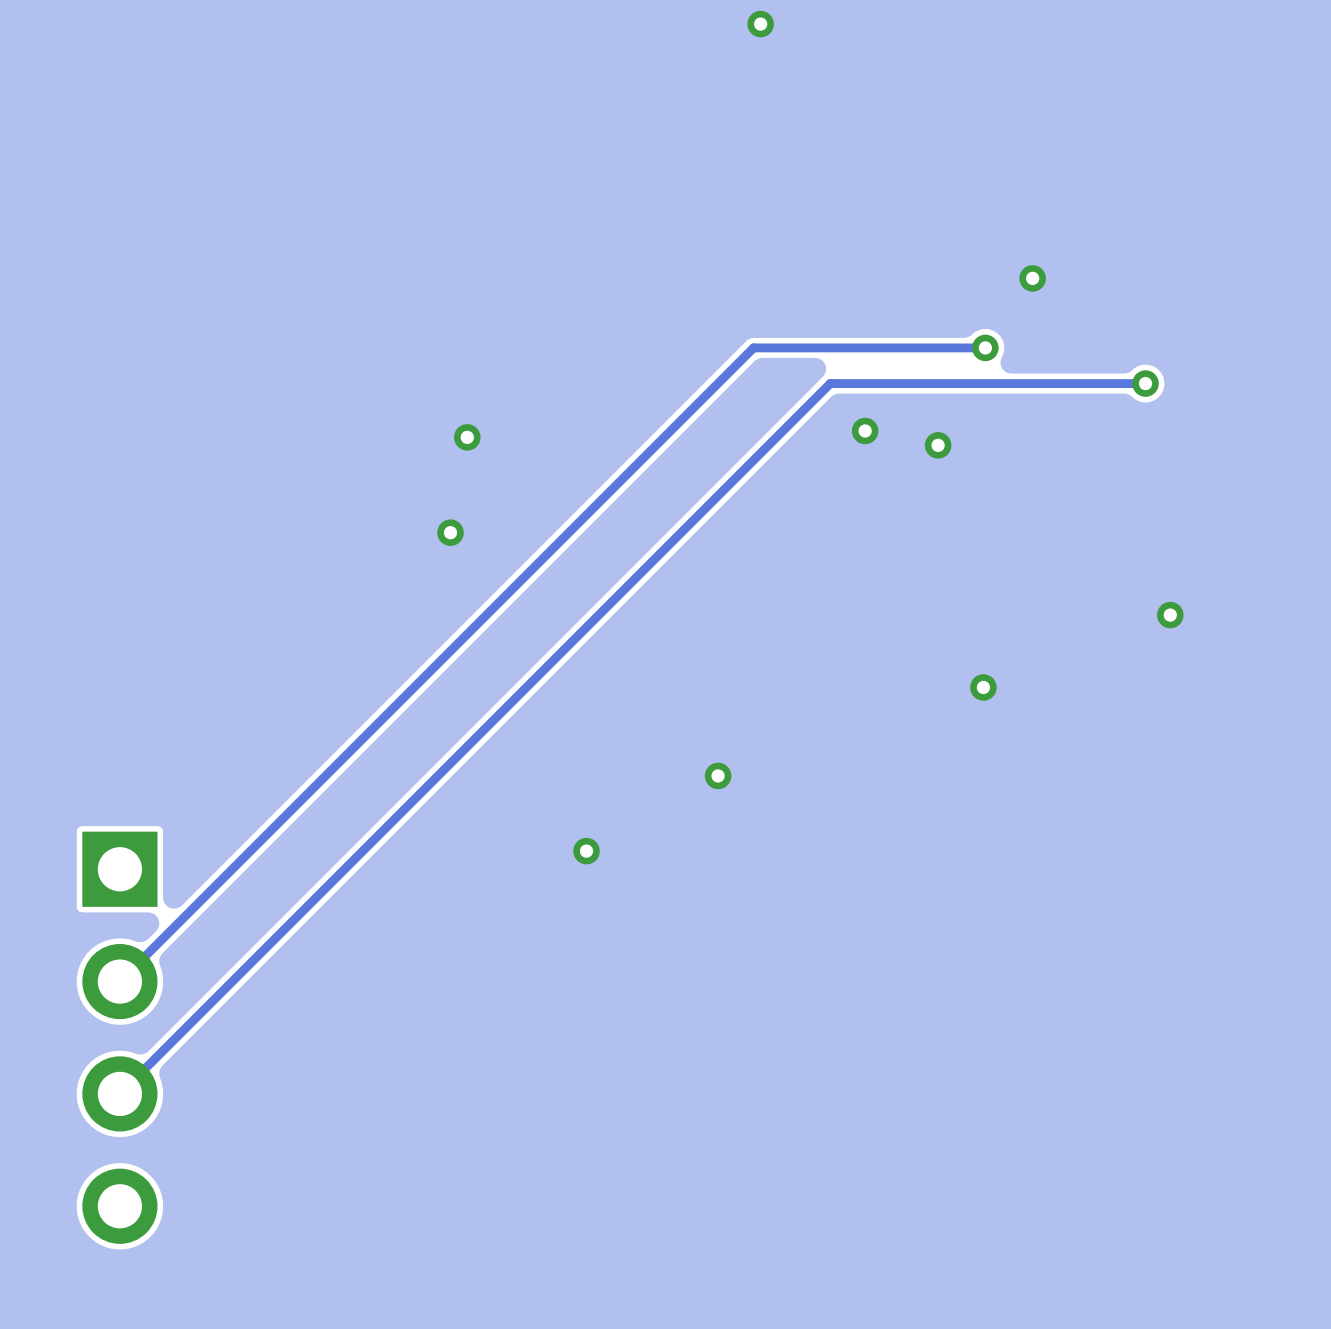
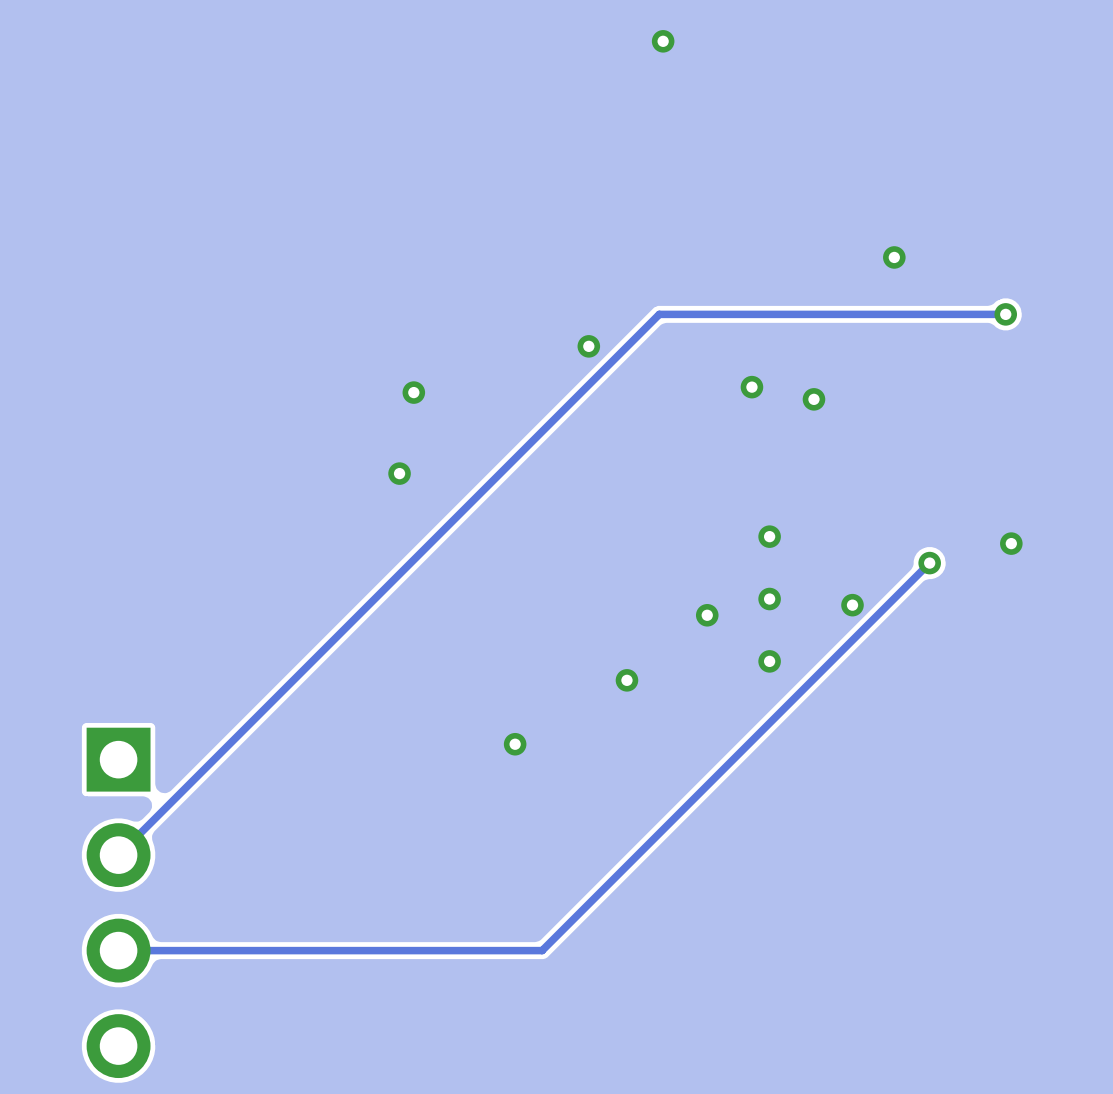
track: (985, 347) (753, 347) -> (1005, 314) (659, 314) (657, 316)
via: (985, 347) -> none
via: none -> (588, 346)
track: (1145, 383) (830, 383) (119, 1093) -> (929, 563) (542, 950) (118, 950)
via position: (1145, 383) -> (1005, 314)
via: none -> (769, 536)
via: none -> (929, 563)
via: none -> (769, 599)
via: none -> (707, 615)
via: none -> (769, 661)

